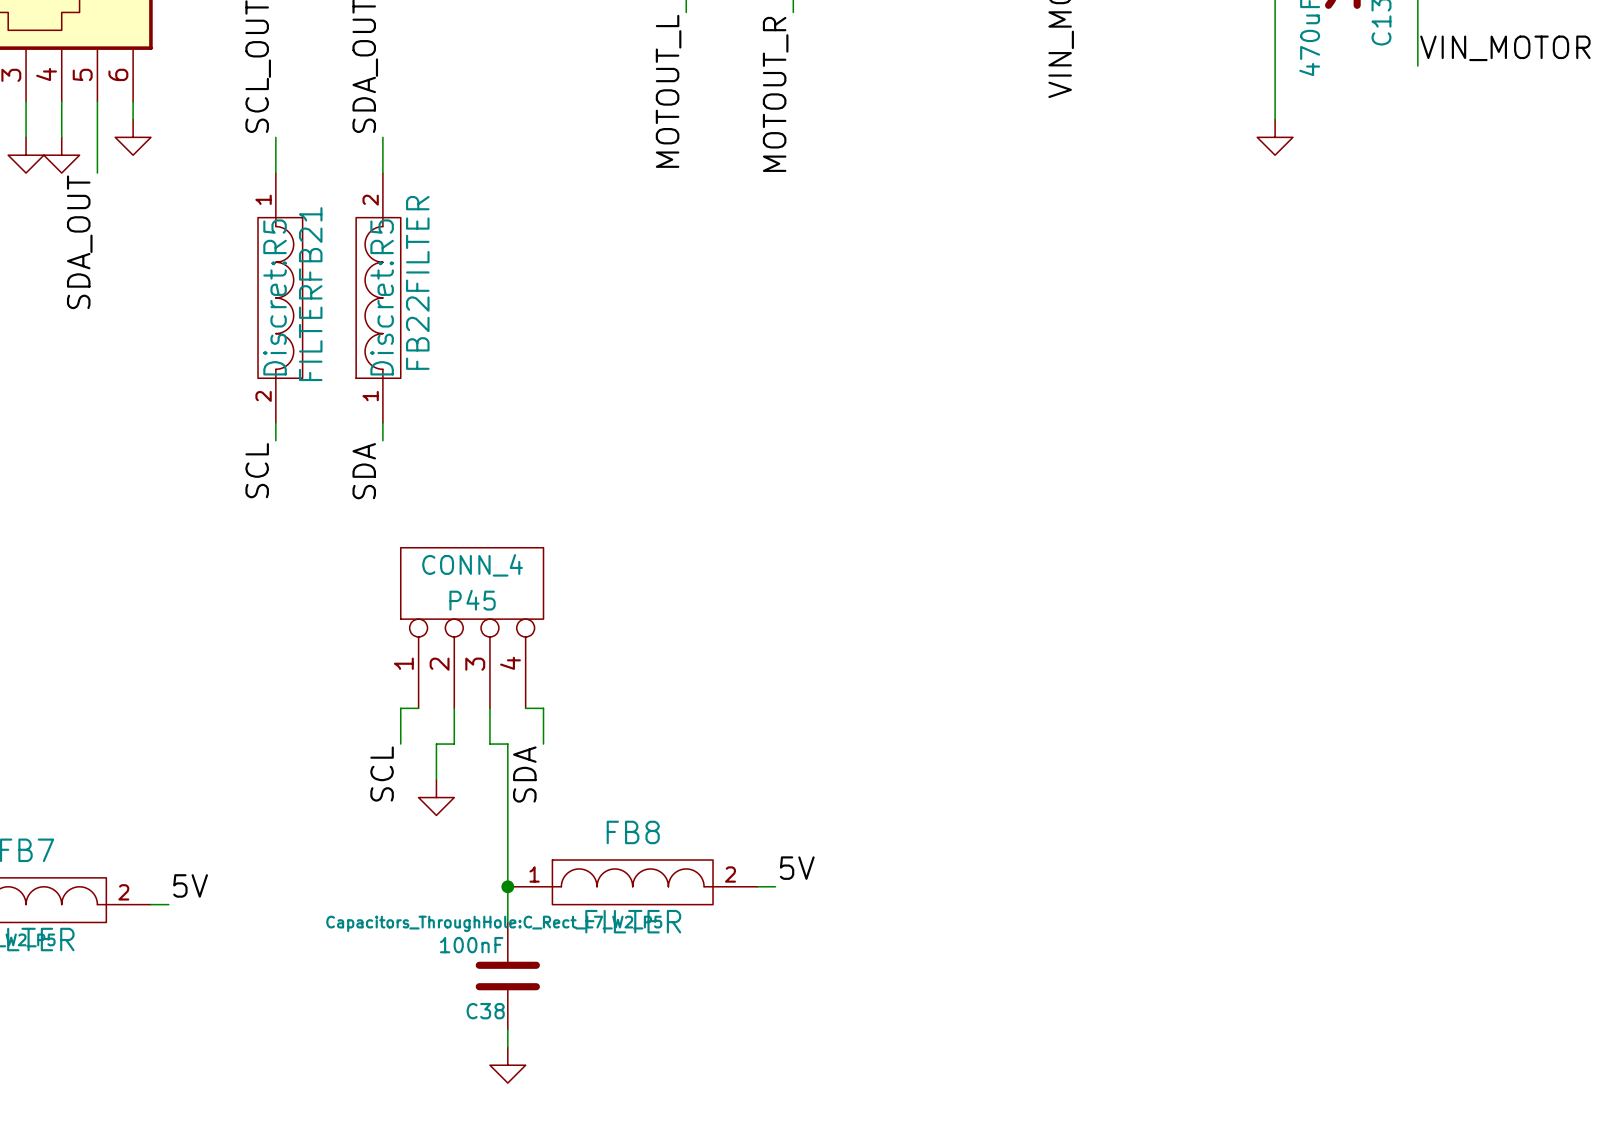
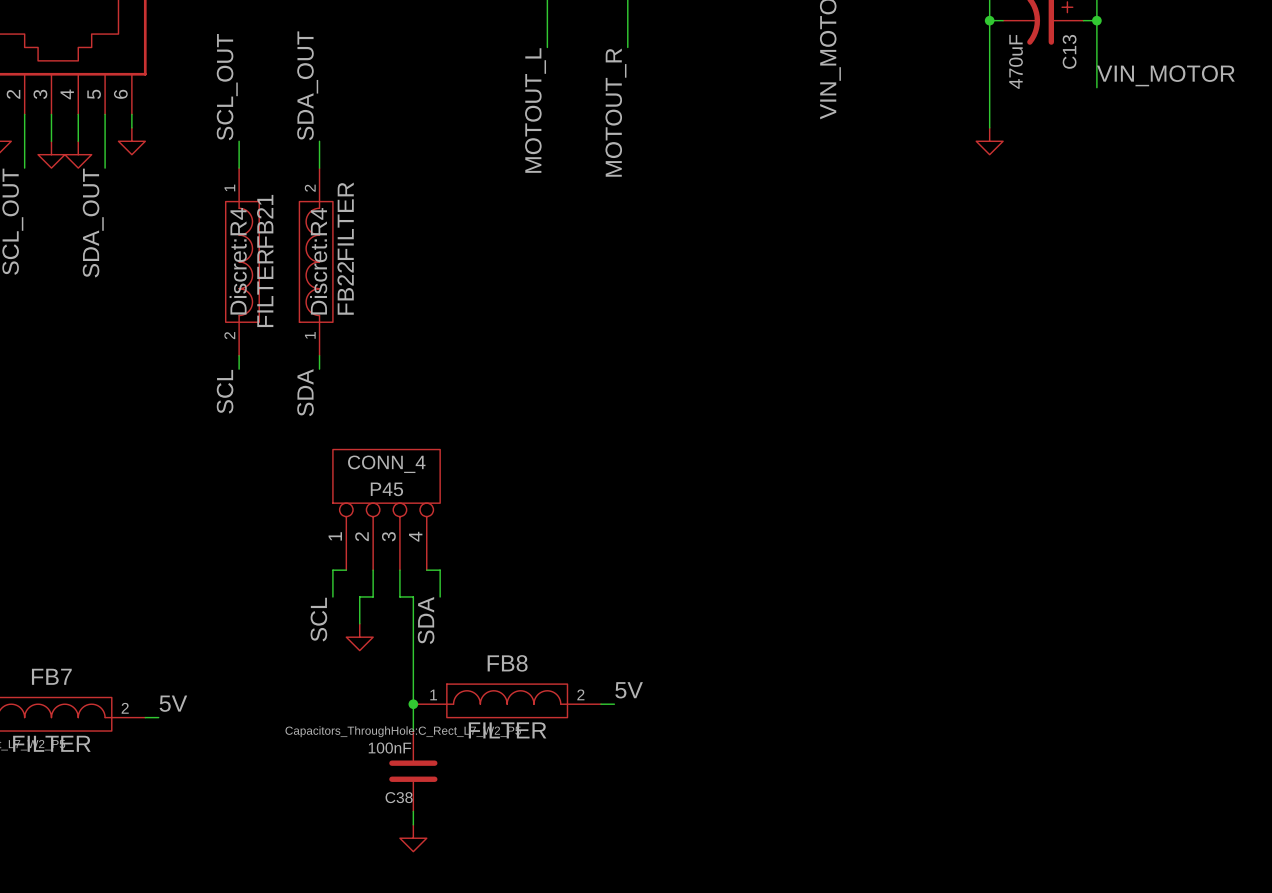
FB21 text: Discret:R5 (275, 297) -> Discret:R4 (238, 261)
FB22 text: Discret:R5 (382, 297) -> Discret:R4 (318, 261)

